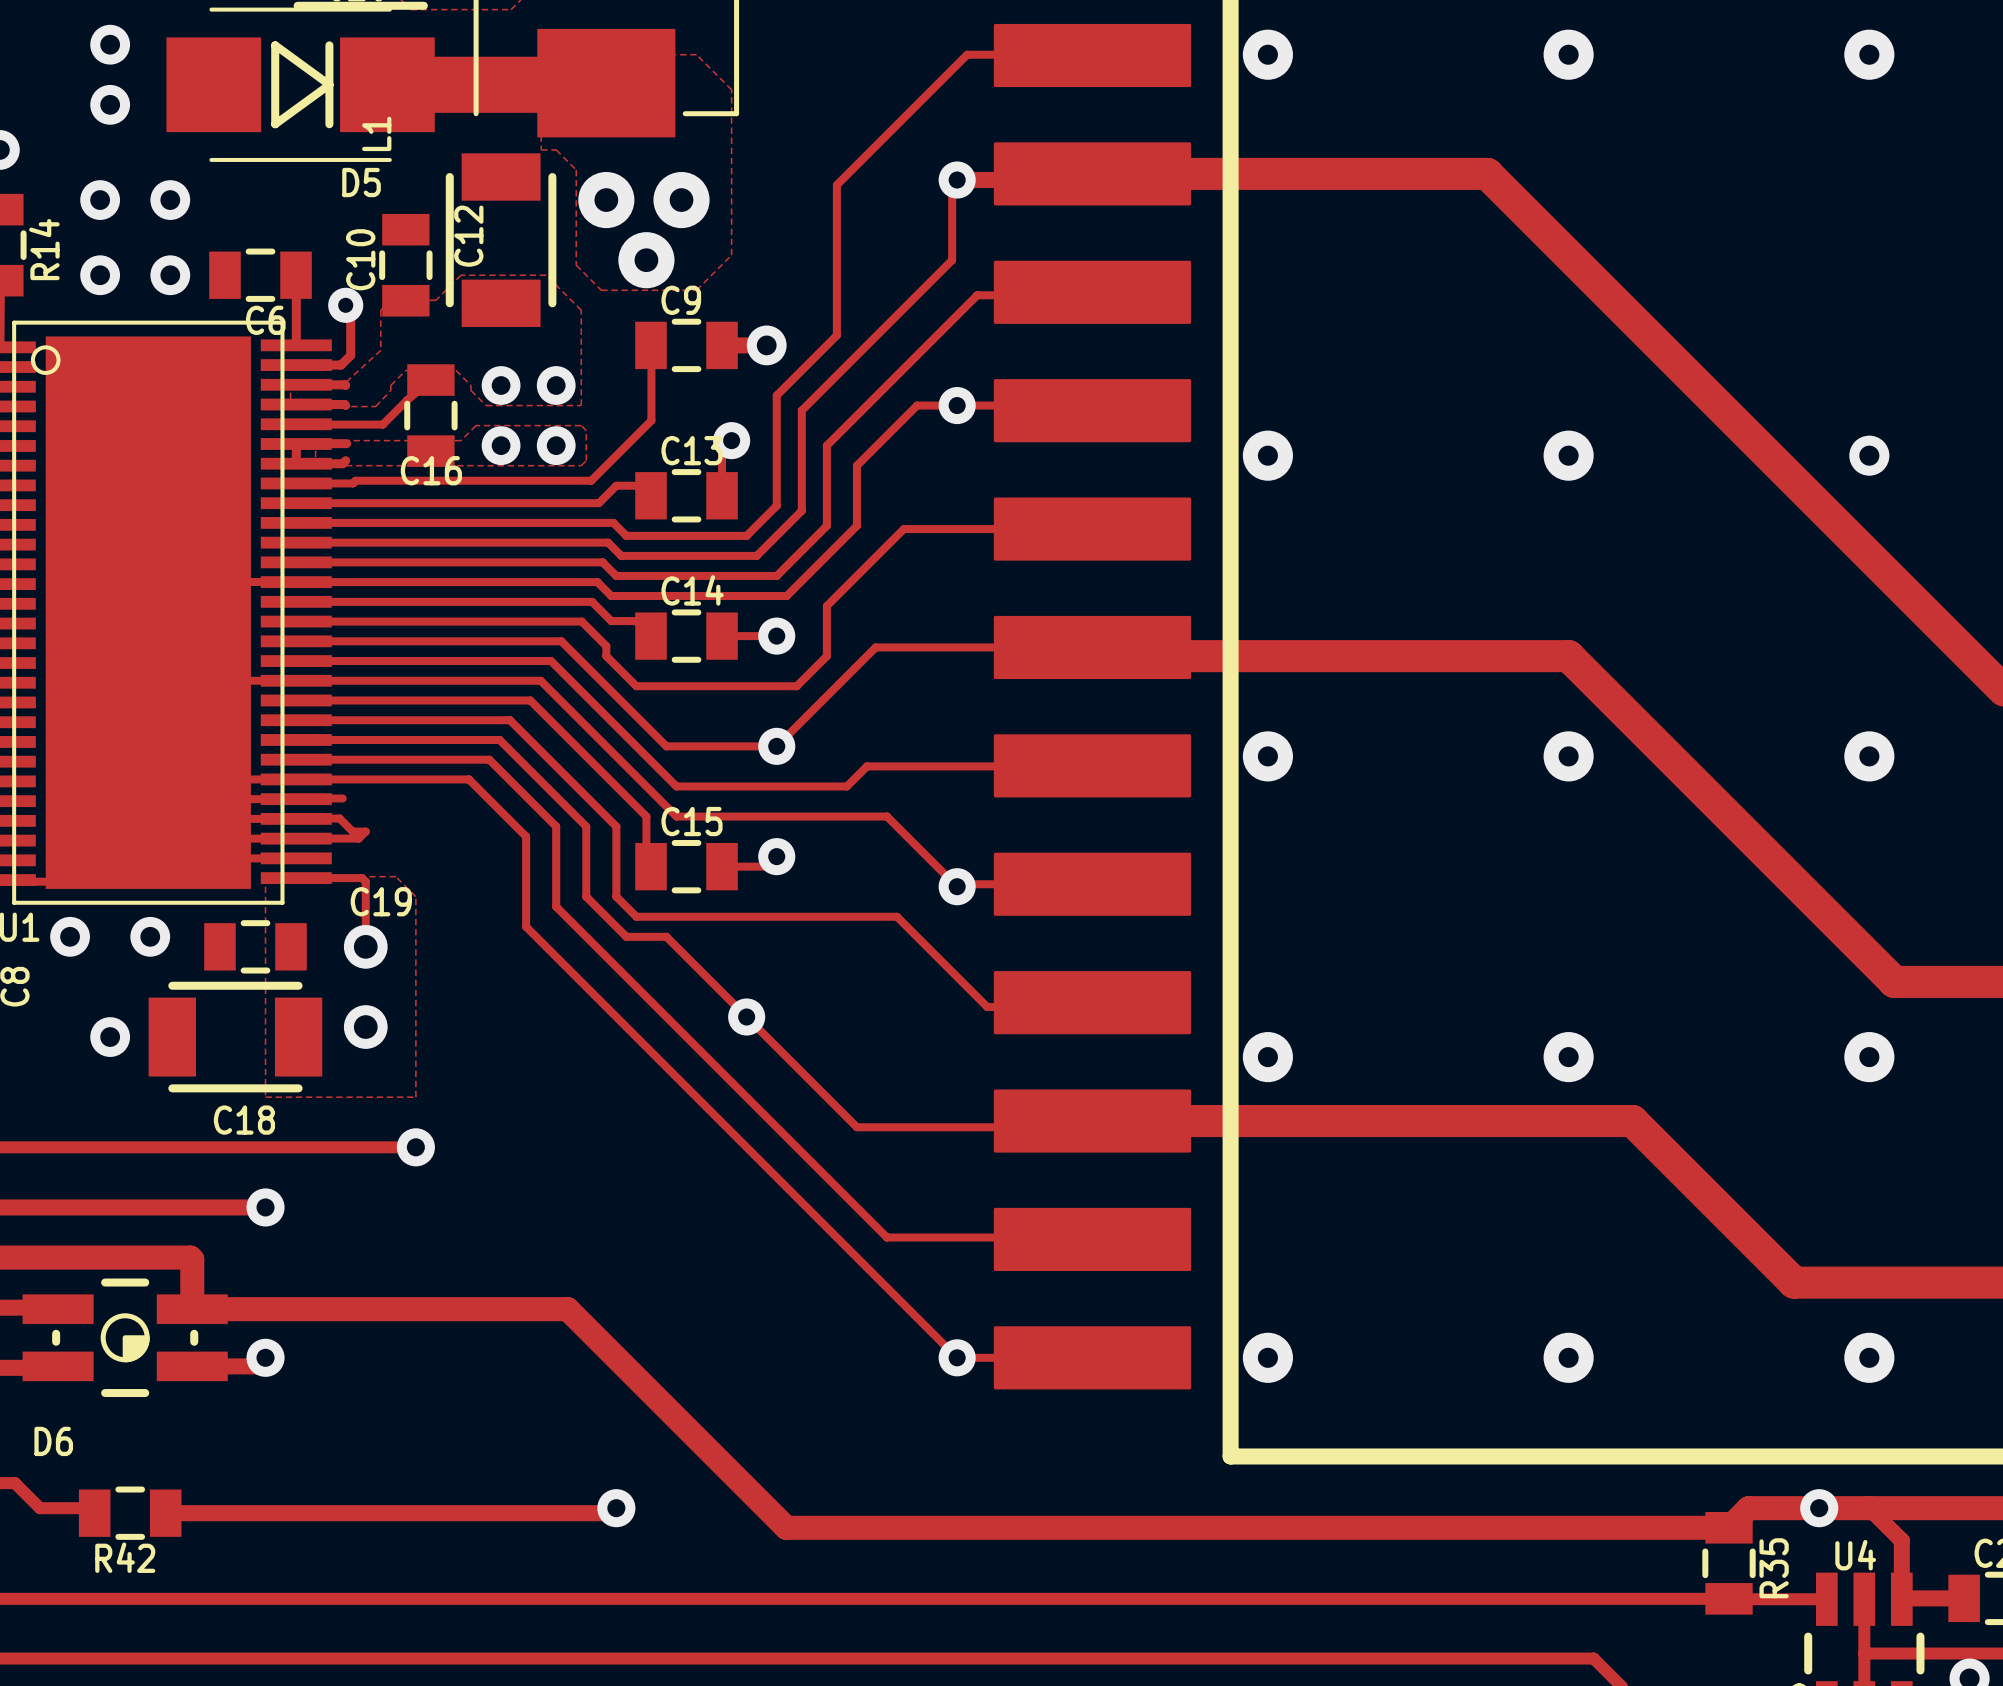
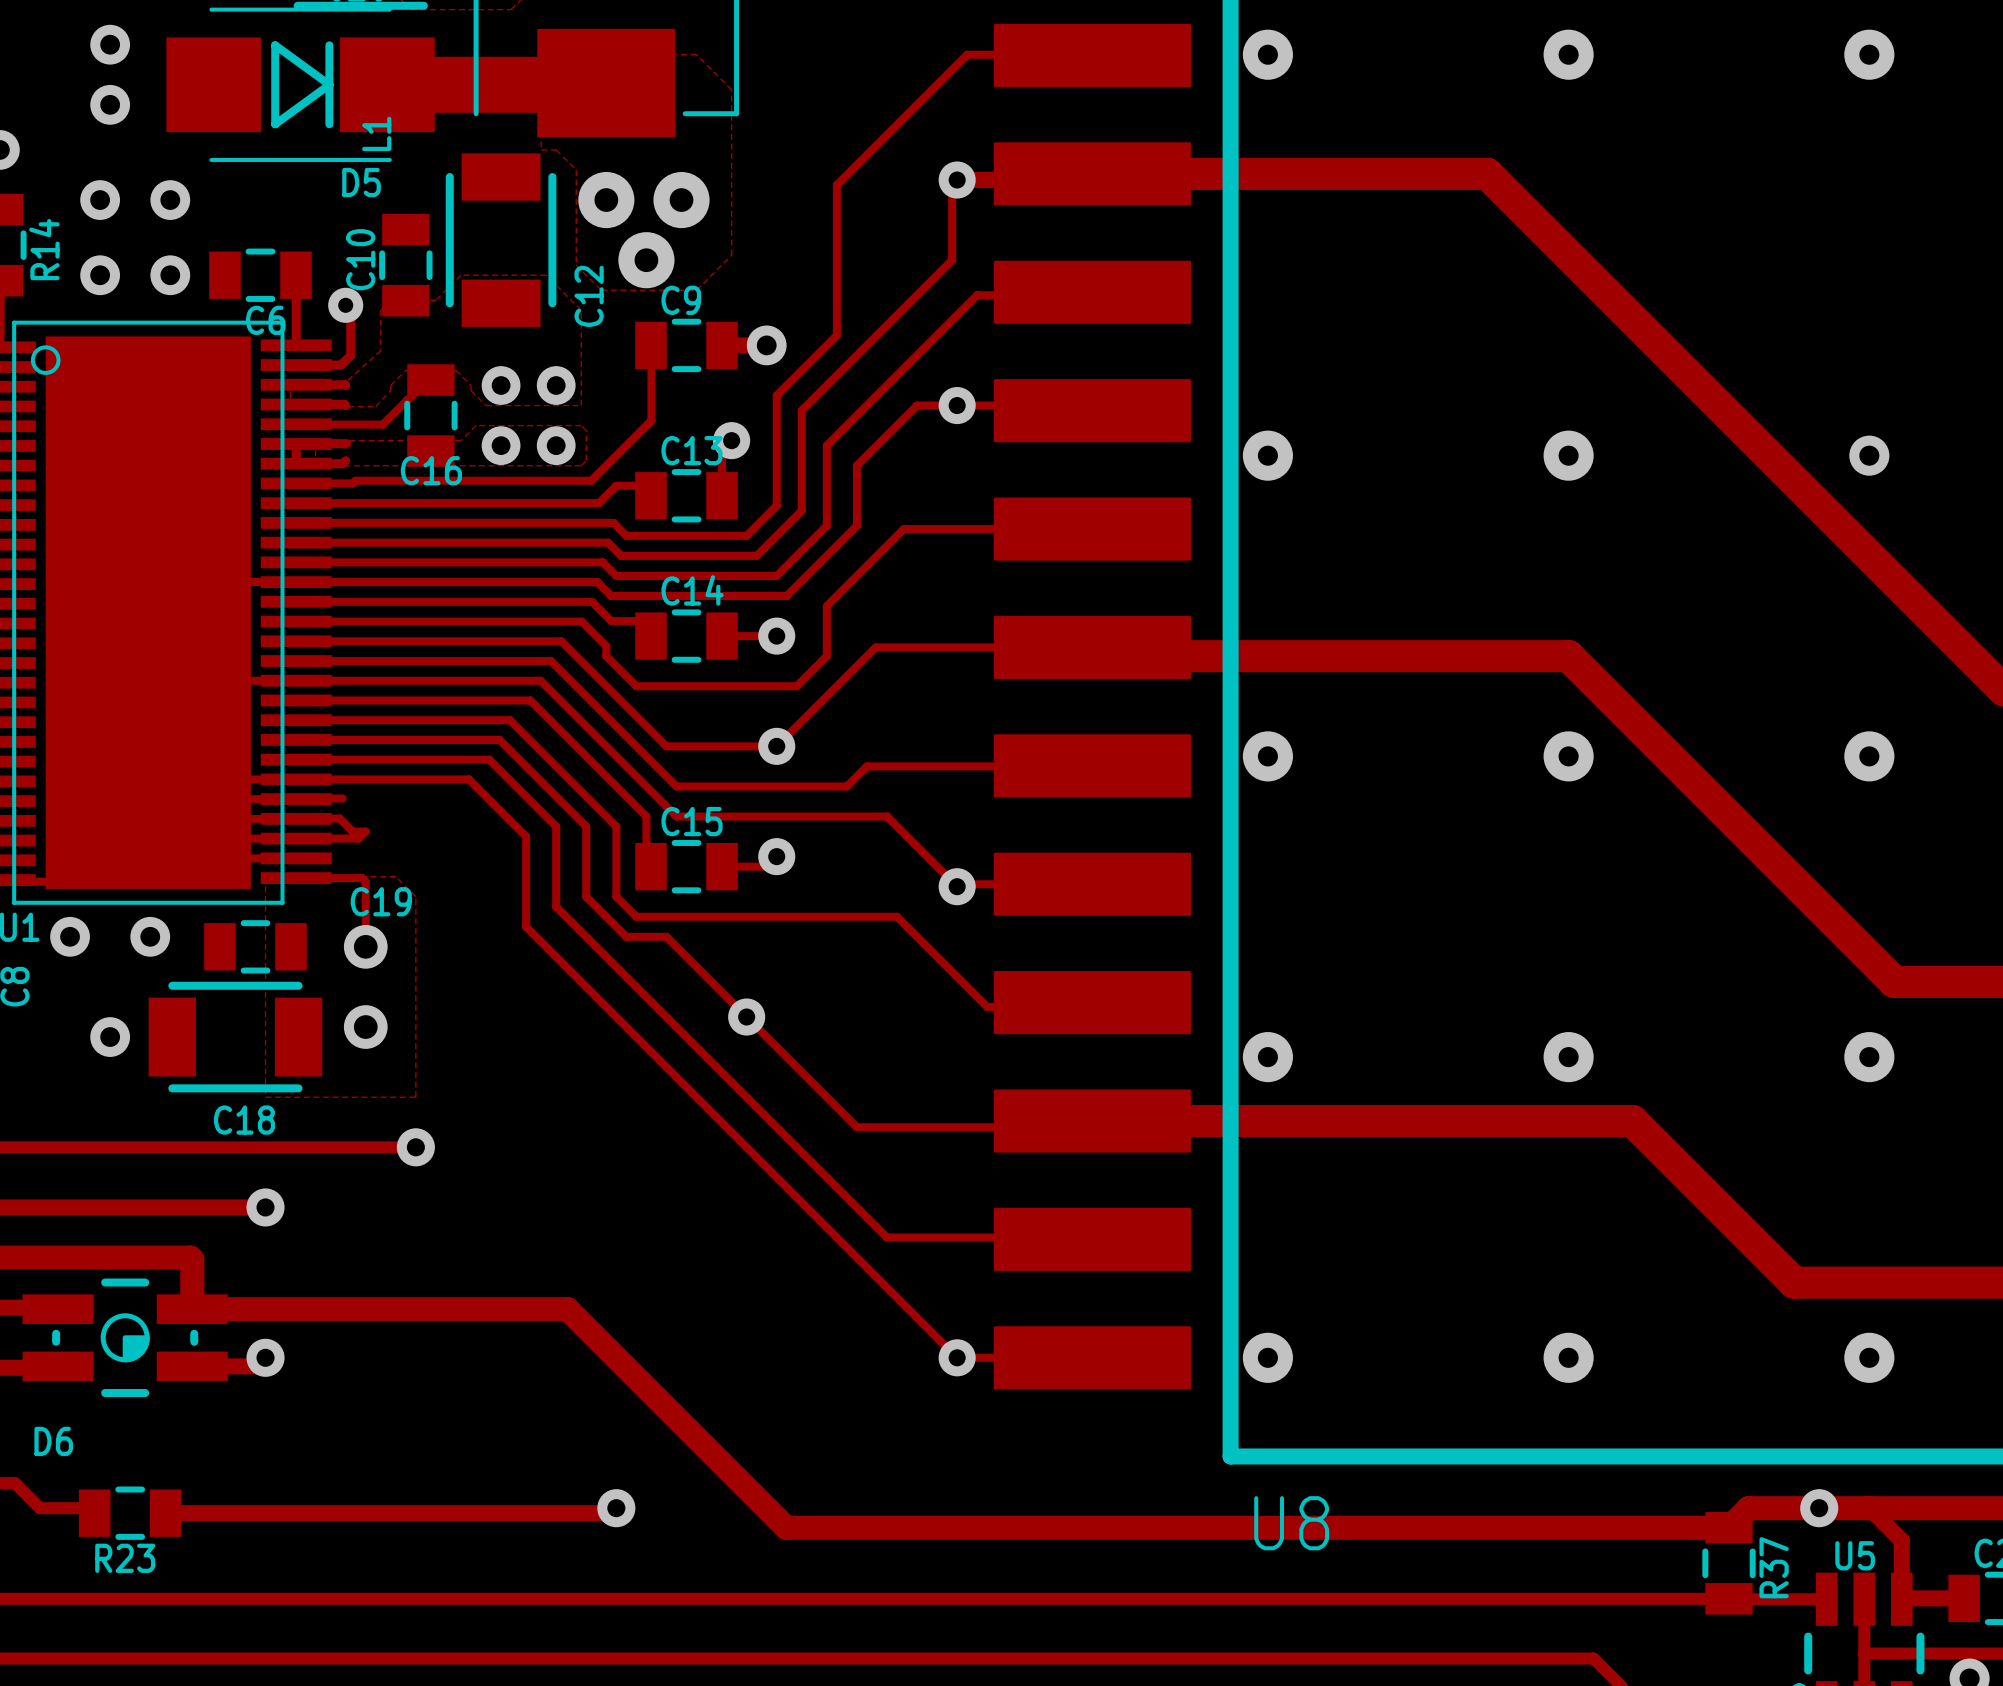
C12 name position: C12 (468, 236) -> C12 (589, 296)
U8 name: none -> U8 (1291, 1523)
U4 name: U4 (1855, 1555) -> U5 (1855, 1555)
R42 name: R42 (125, 1557) -> R23 (125, 1558)
R35 name: R35 (1774, 1568) -> R37 (1774, 1567)

